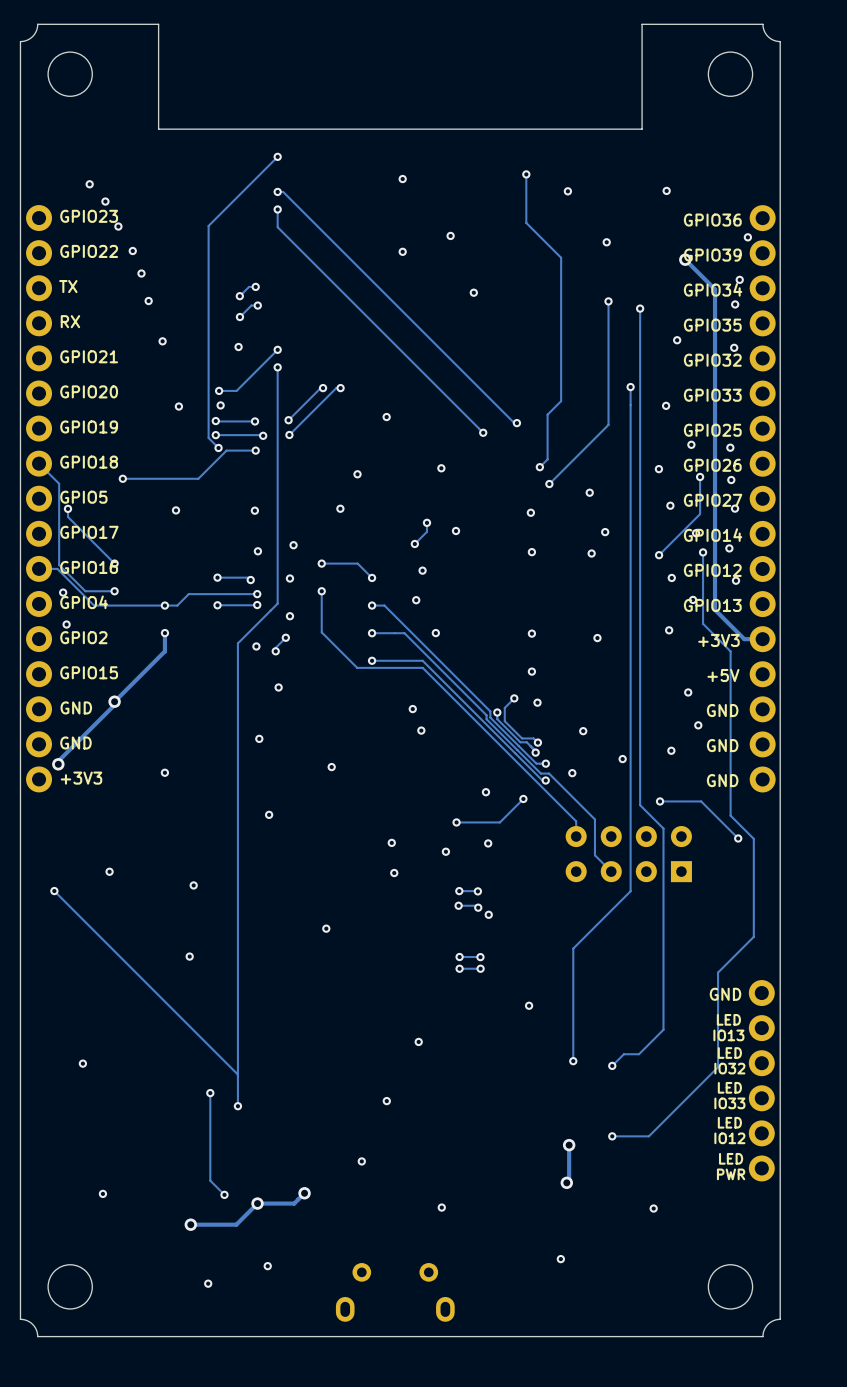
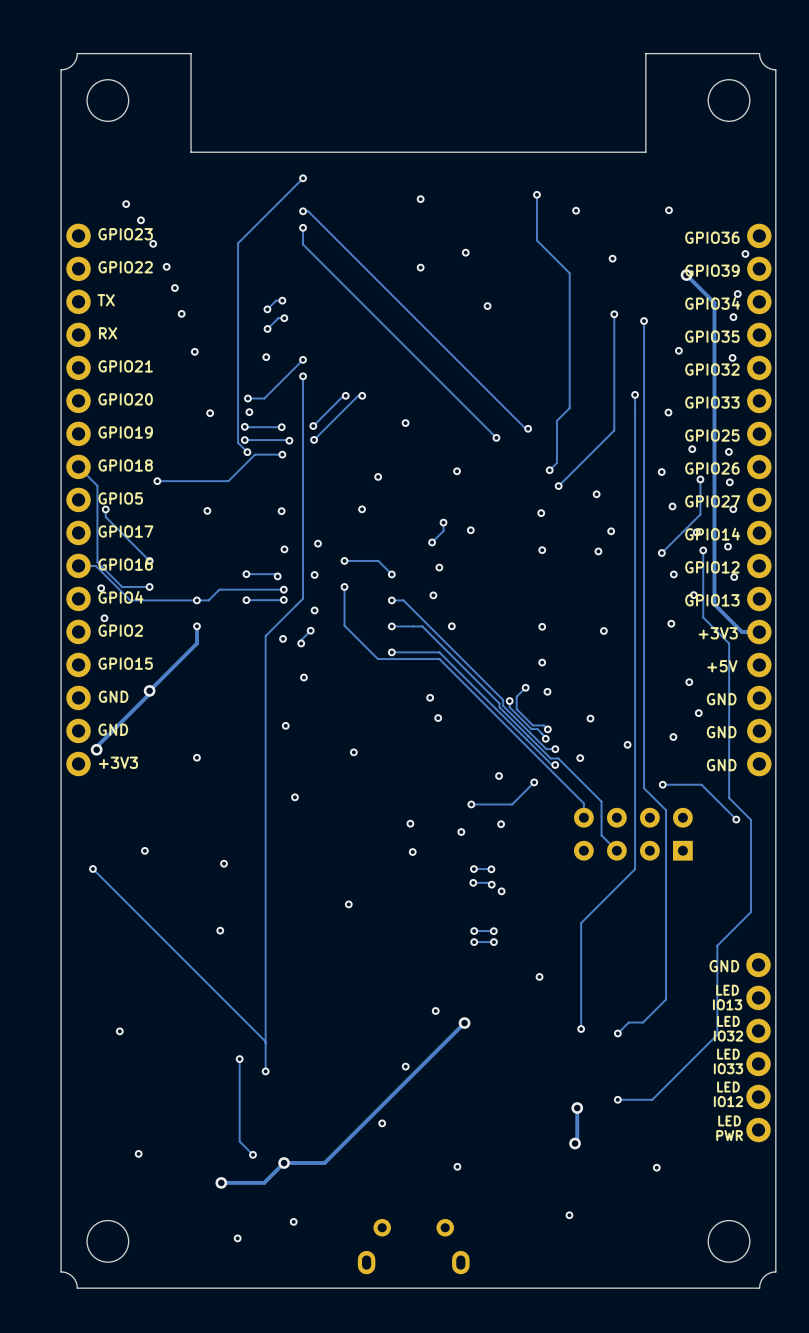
via: none -> (464, 1023)
track: (304, 1193) (294, 1203) -> (464, 1023) (324, 1163) (318, 1163)
via: (304, 1193) -> none

